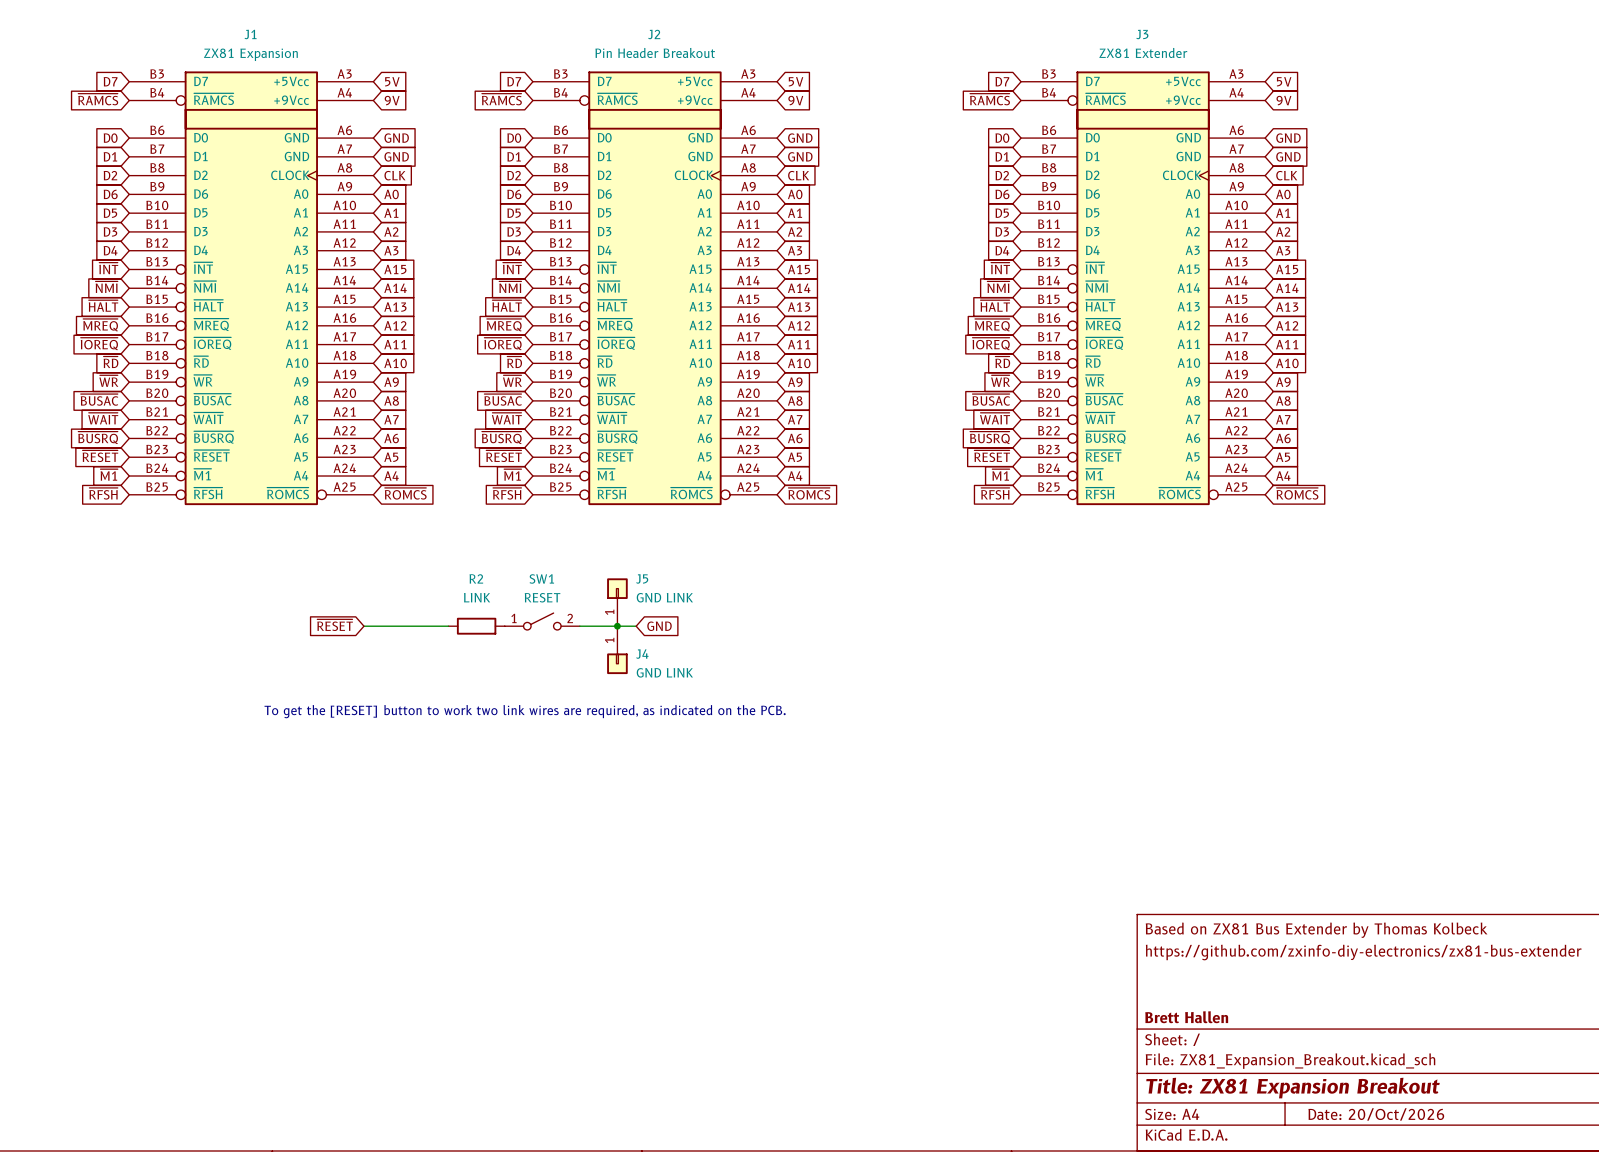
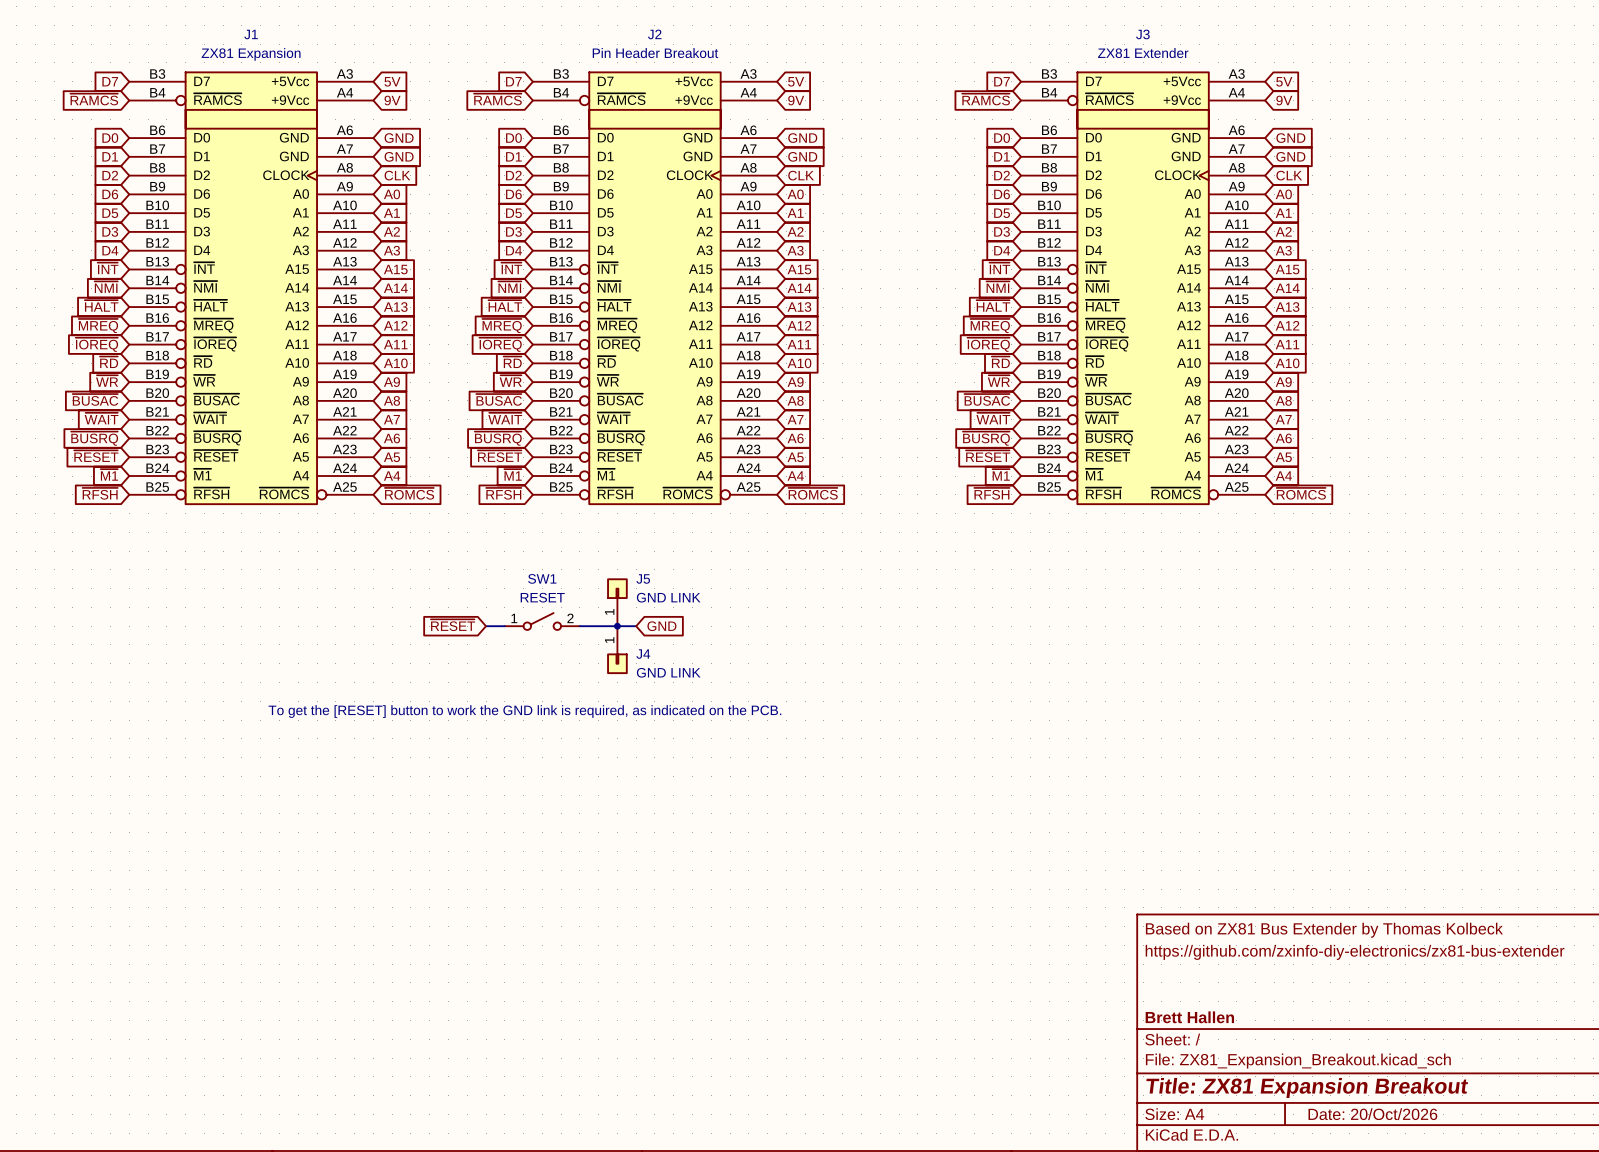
global label position: ~{RESET} (335, 625) -> ~{RESET} (453, 625)
wire: (363, 626) (448, 626) -> none
R2: LINK (476, 626) -> none
text: To get the [RESET] button to work two link wires are required, as indicated on the PCB. (525, 711) -> To get the [RESET] button to work the GND link is required, as indicated on the PCB. (524, 711)

